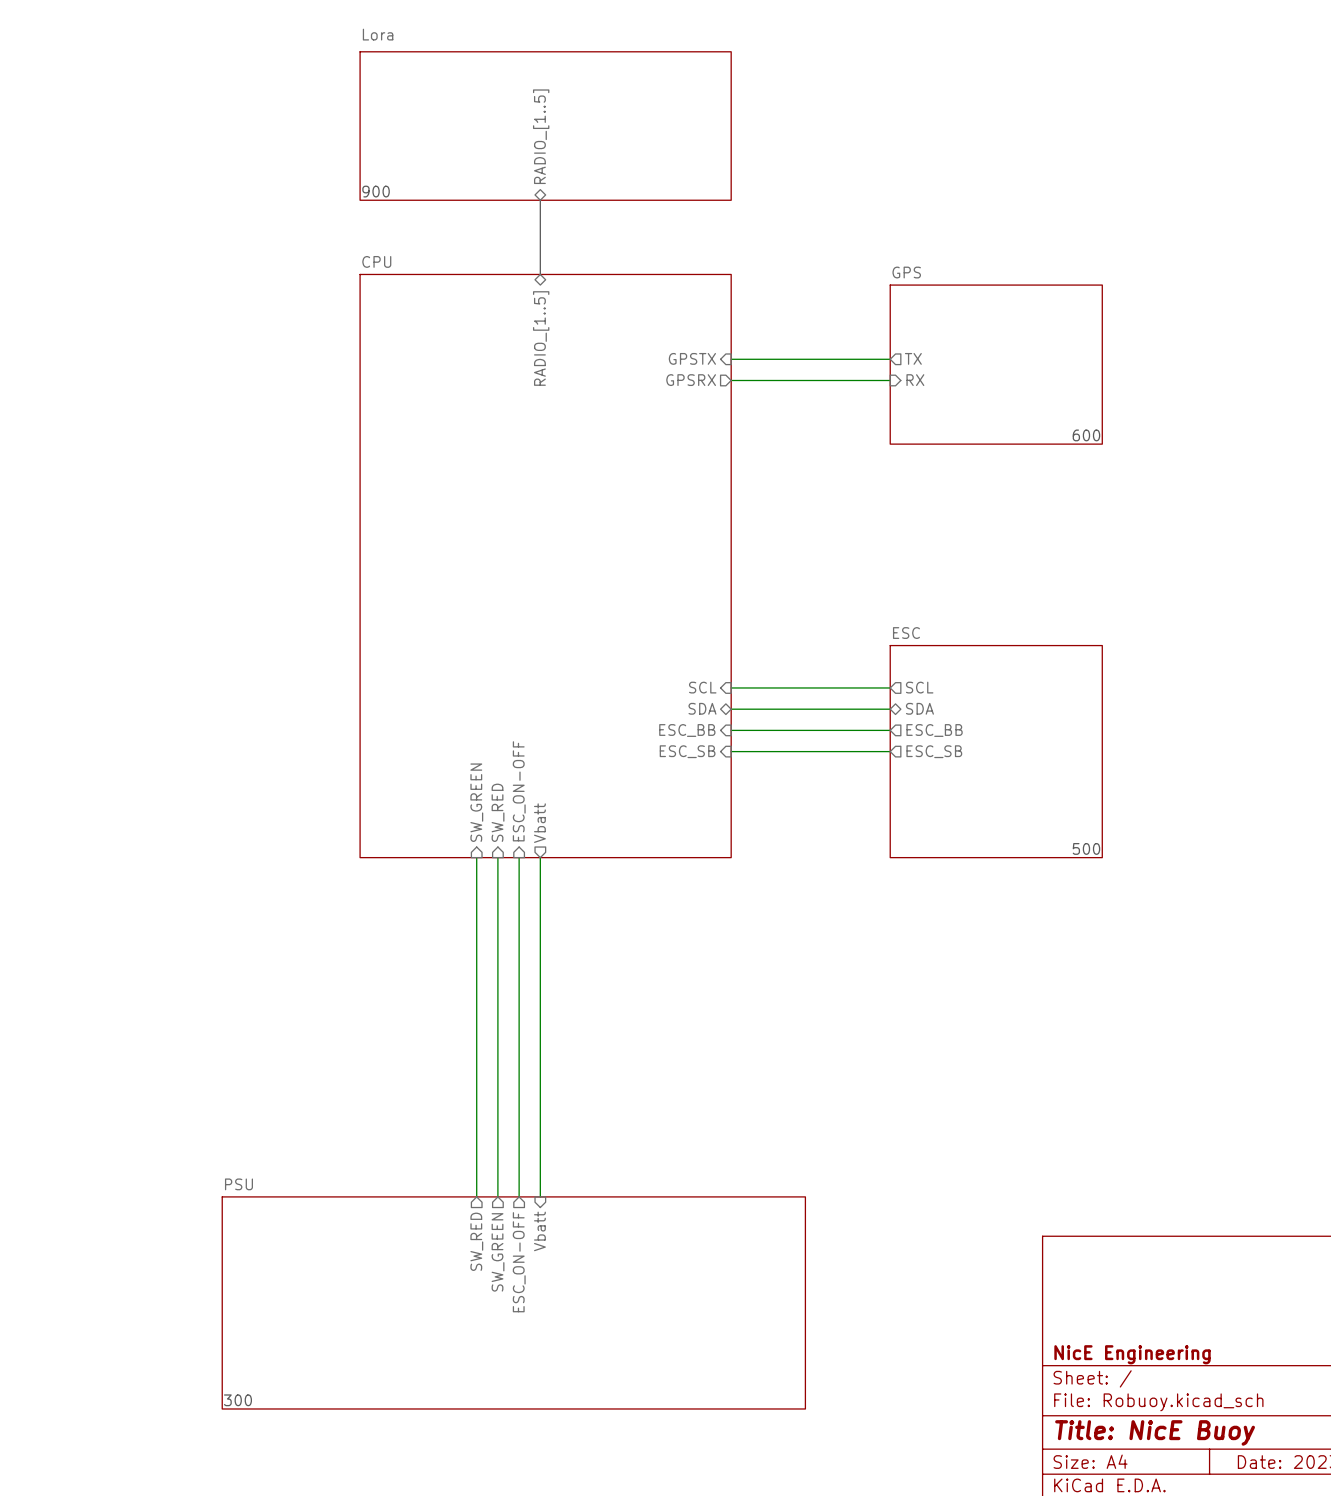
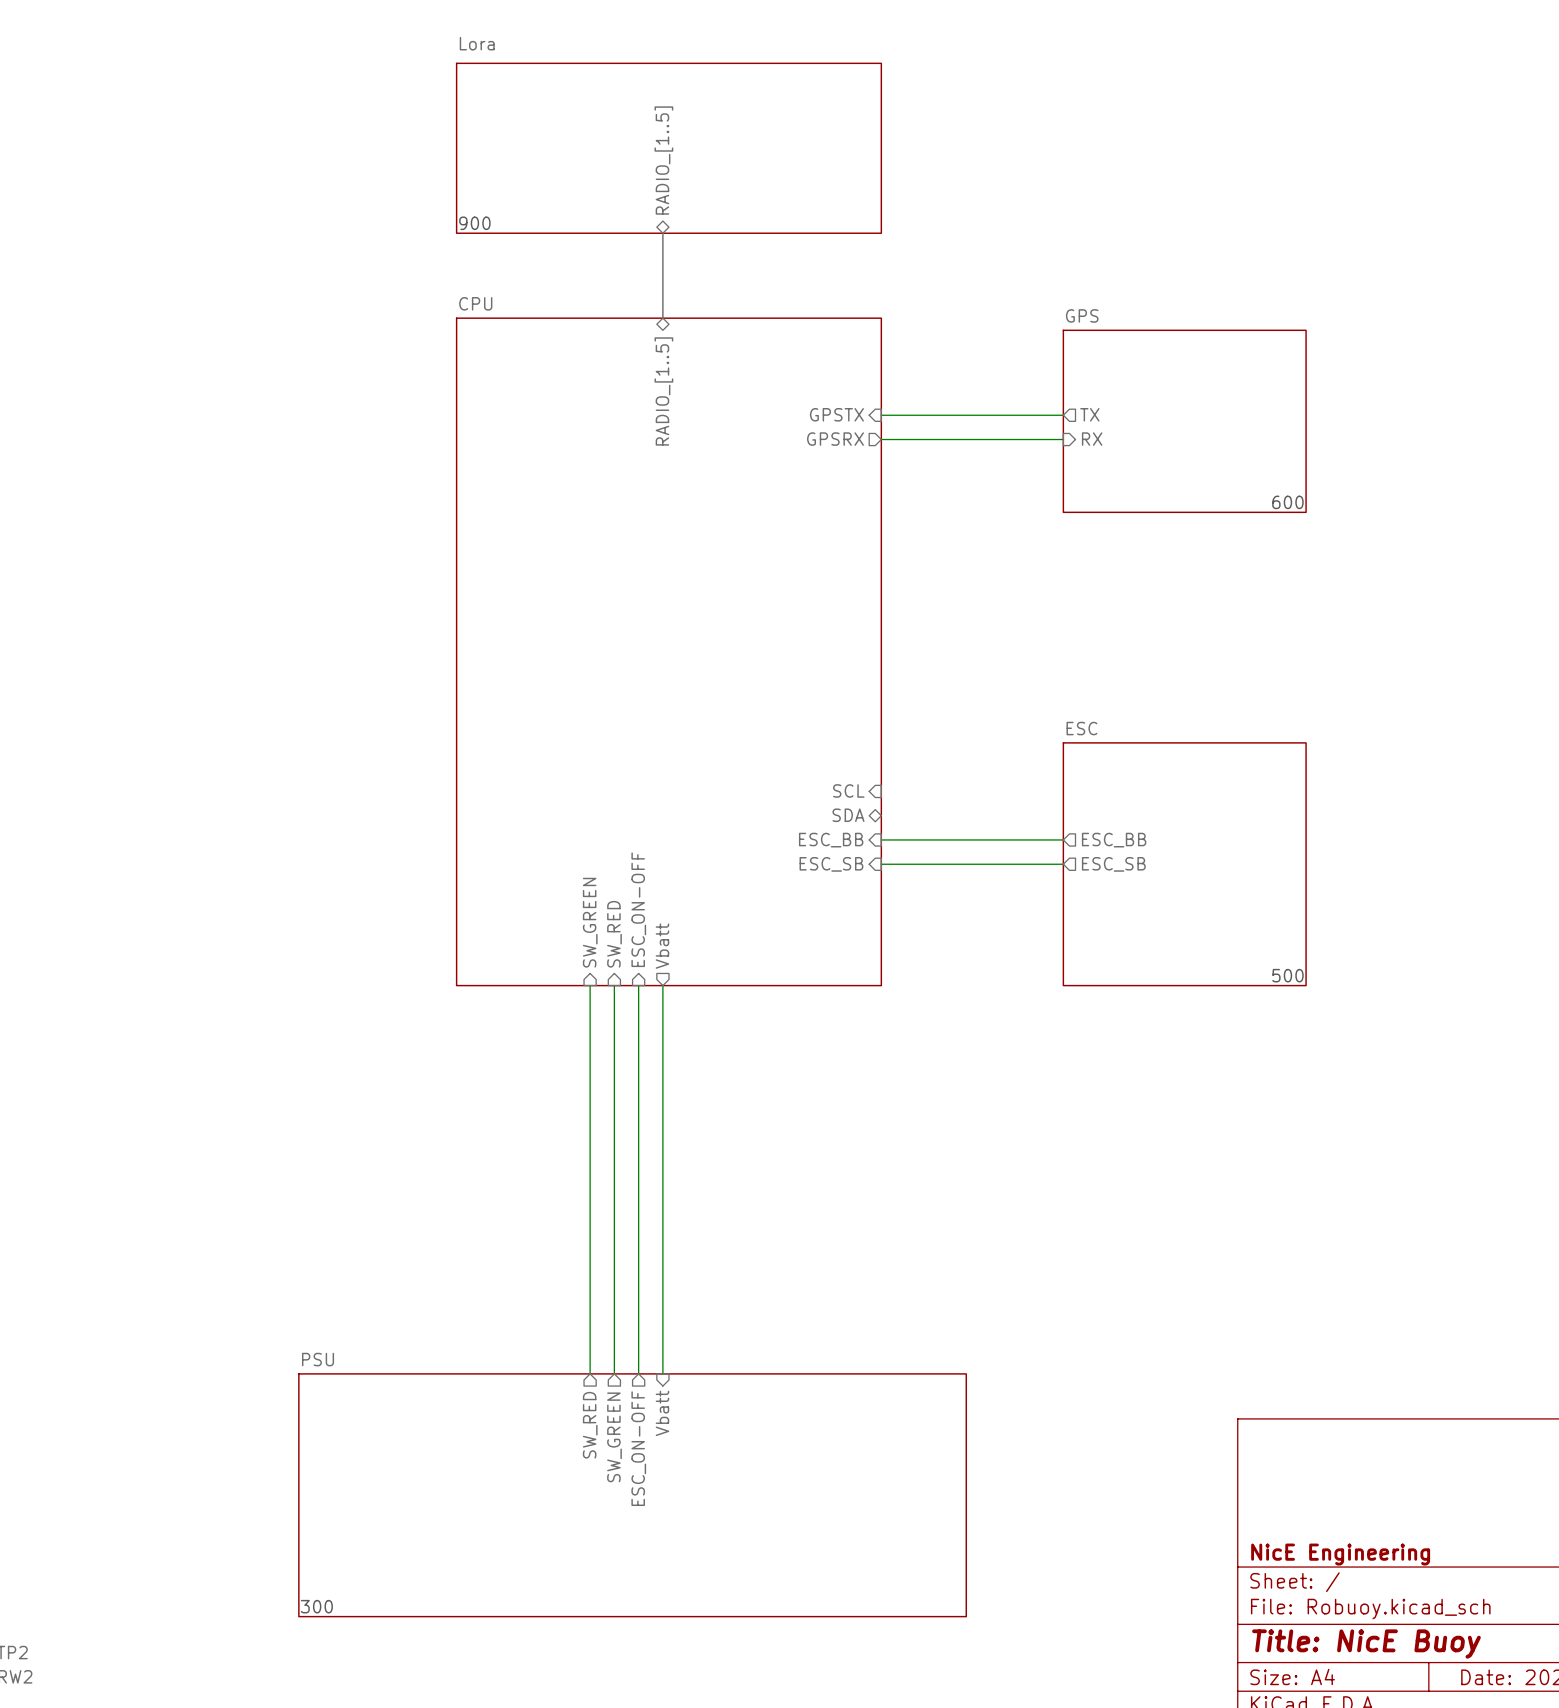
wire: (731, 687) (890, 687) -> none
sheet pin: SCL (919, 687) -> none
sheet pin: SDA (919, 708) -> none
wire: (731, 709) (890, 709) -> none

